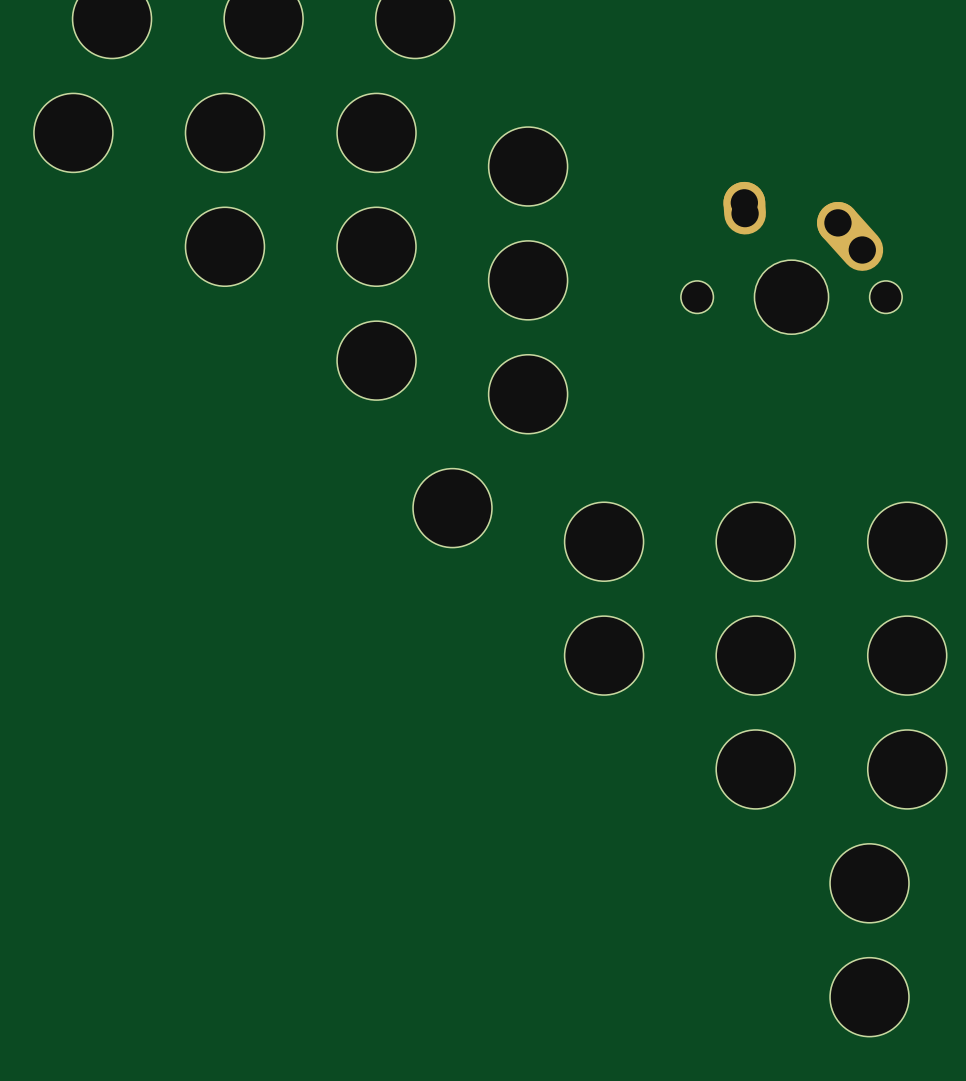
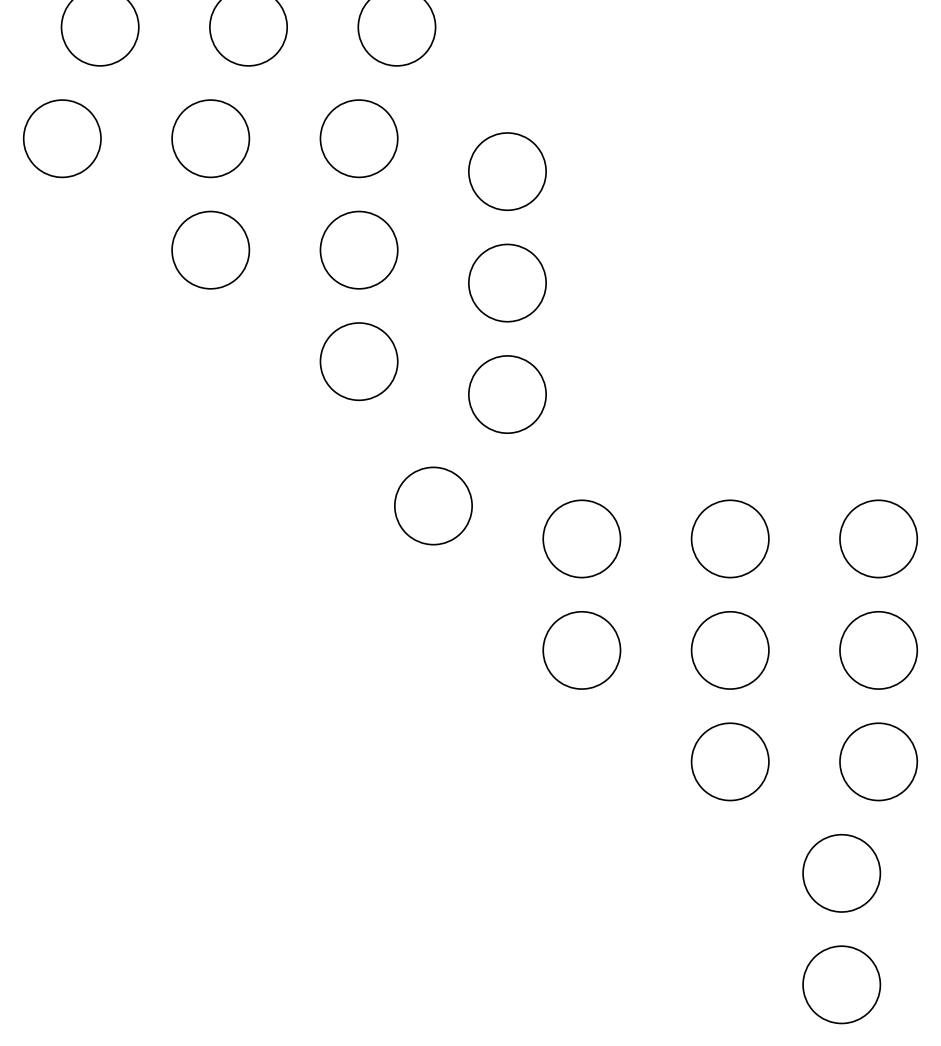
part: (791, 258) -> none

